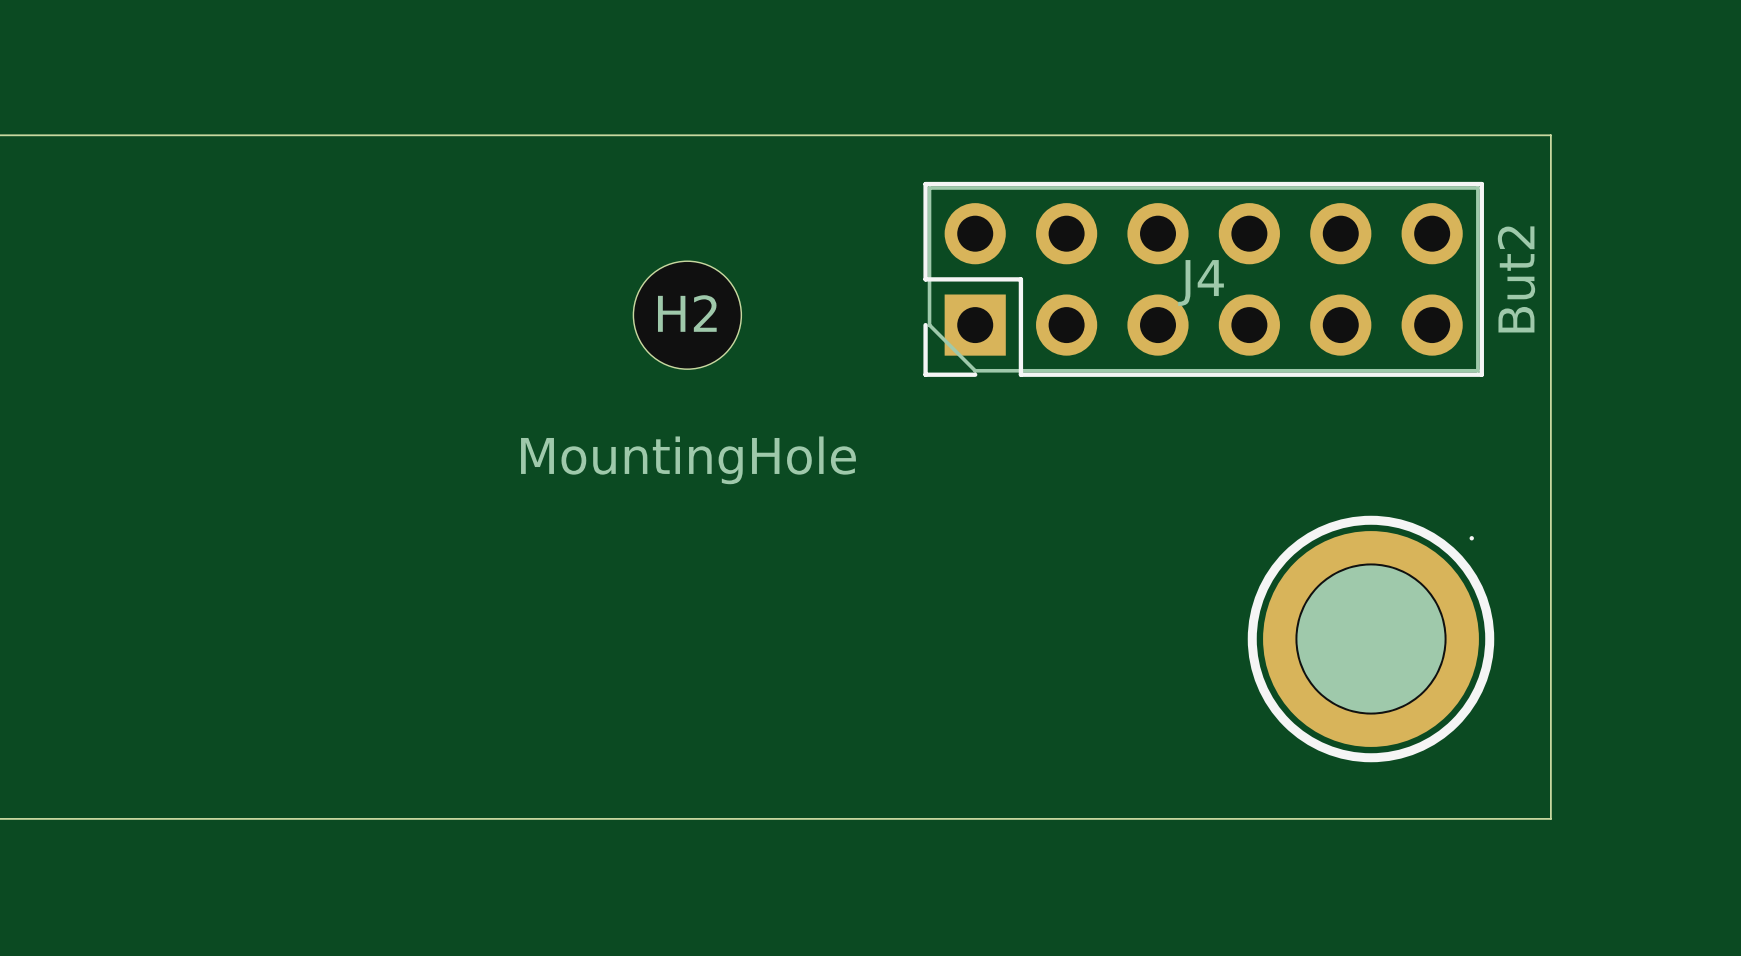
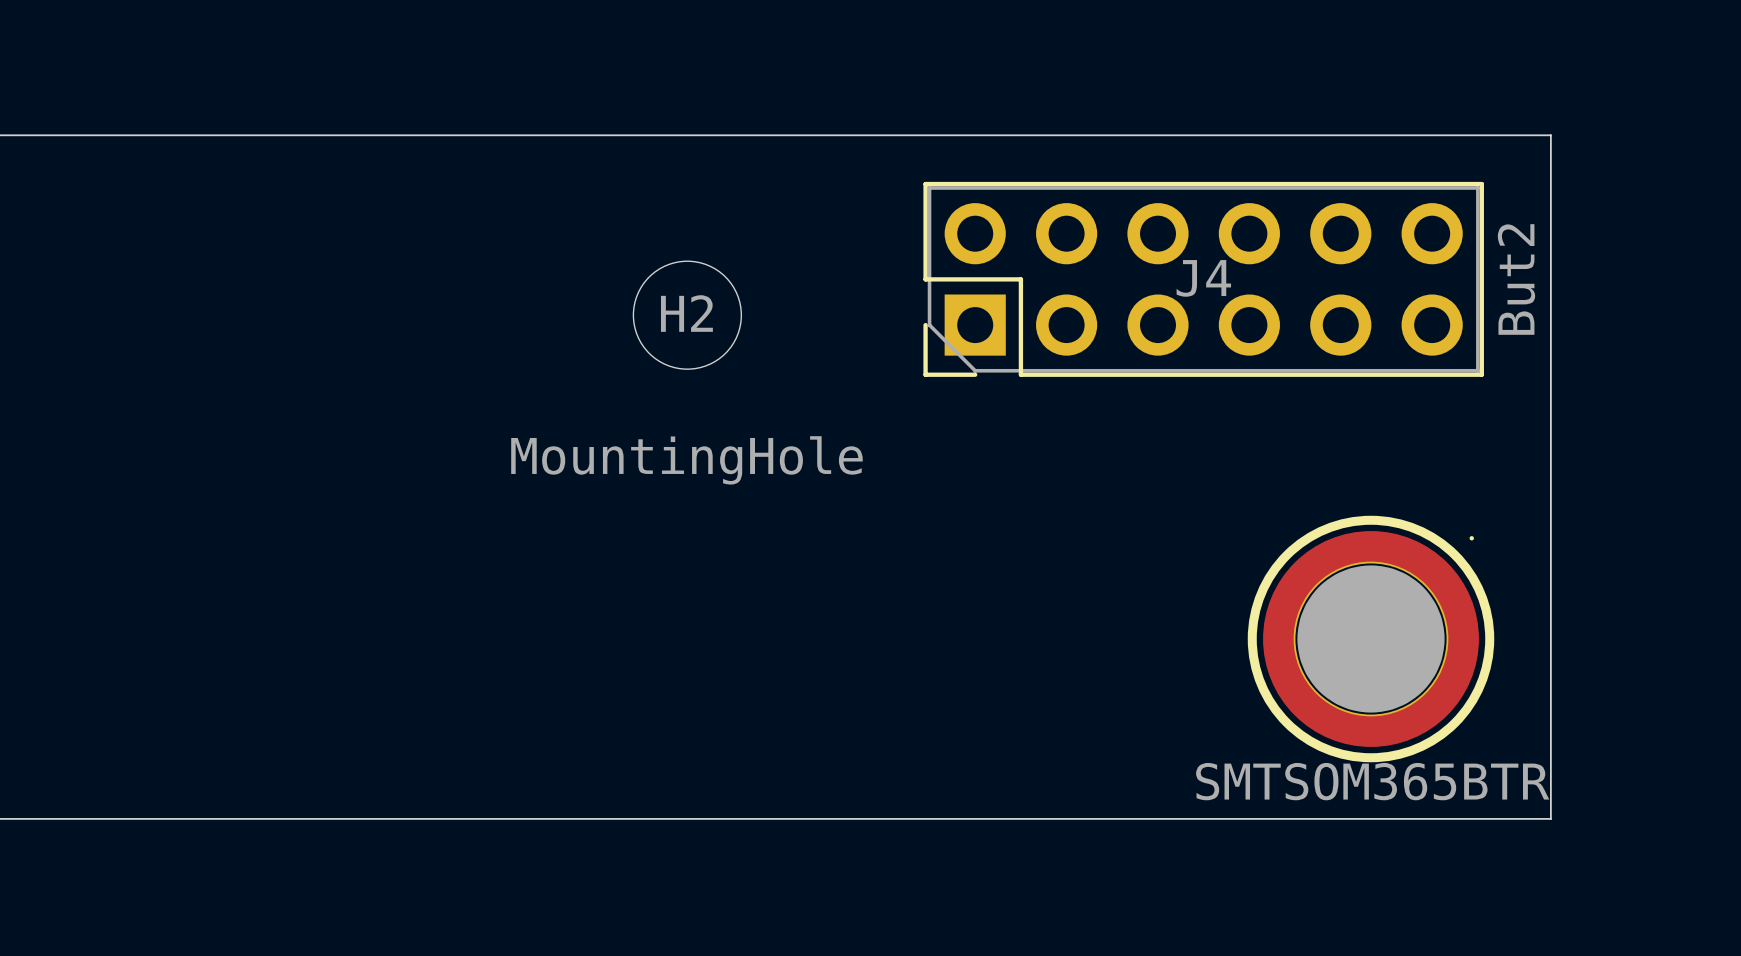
part footprint: [1247, 515, 1495, 763] -> [1247, 515, 1495, 763]
part value: none -> SMTSOM365BTR (1372, 781)

